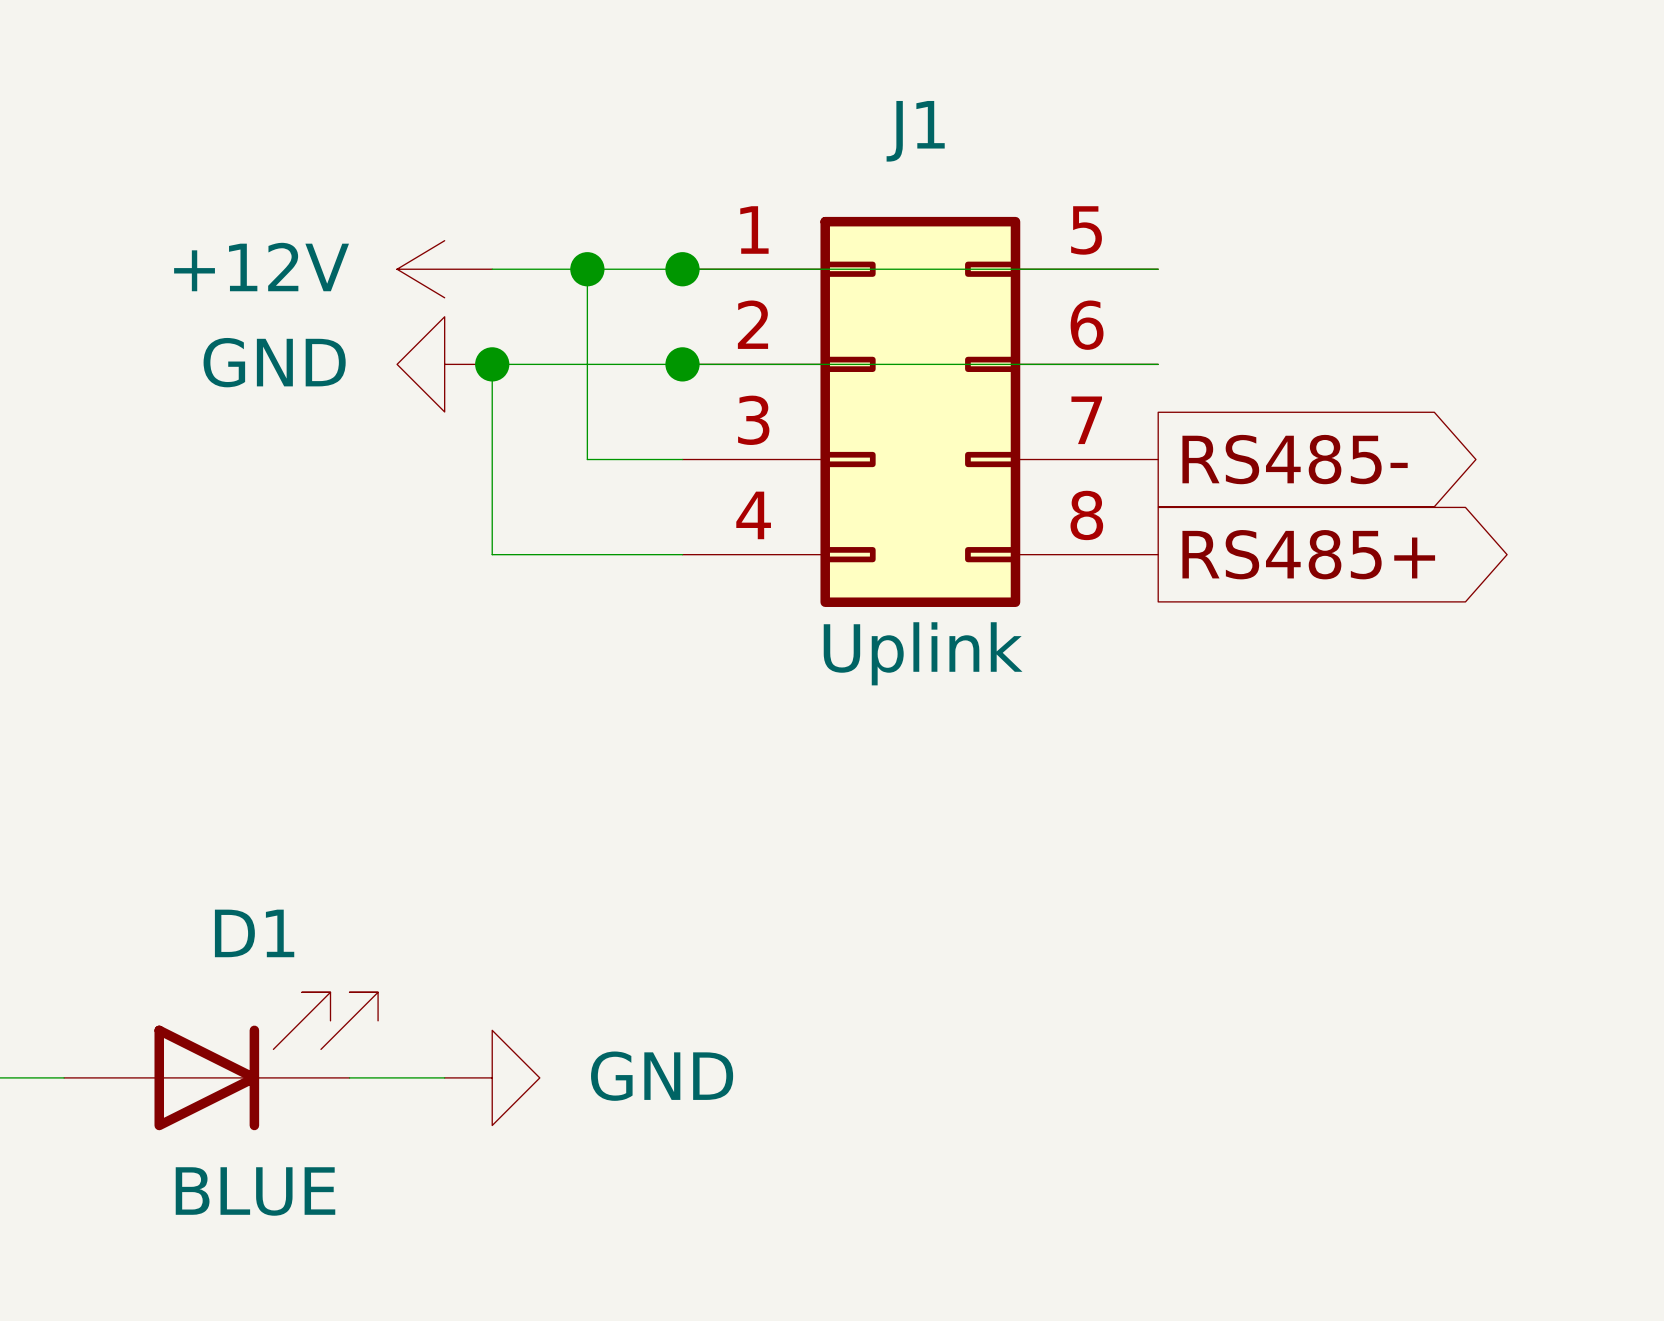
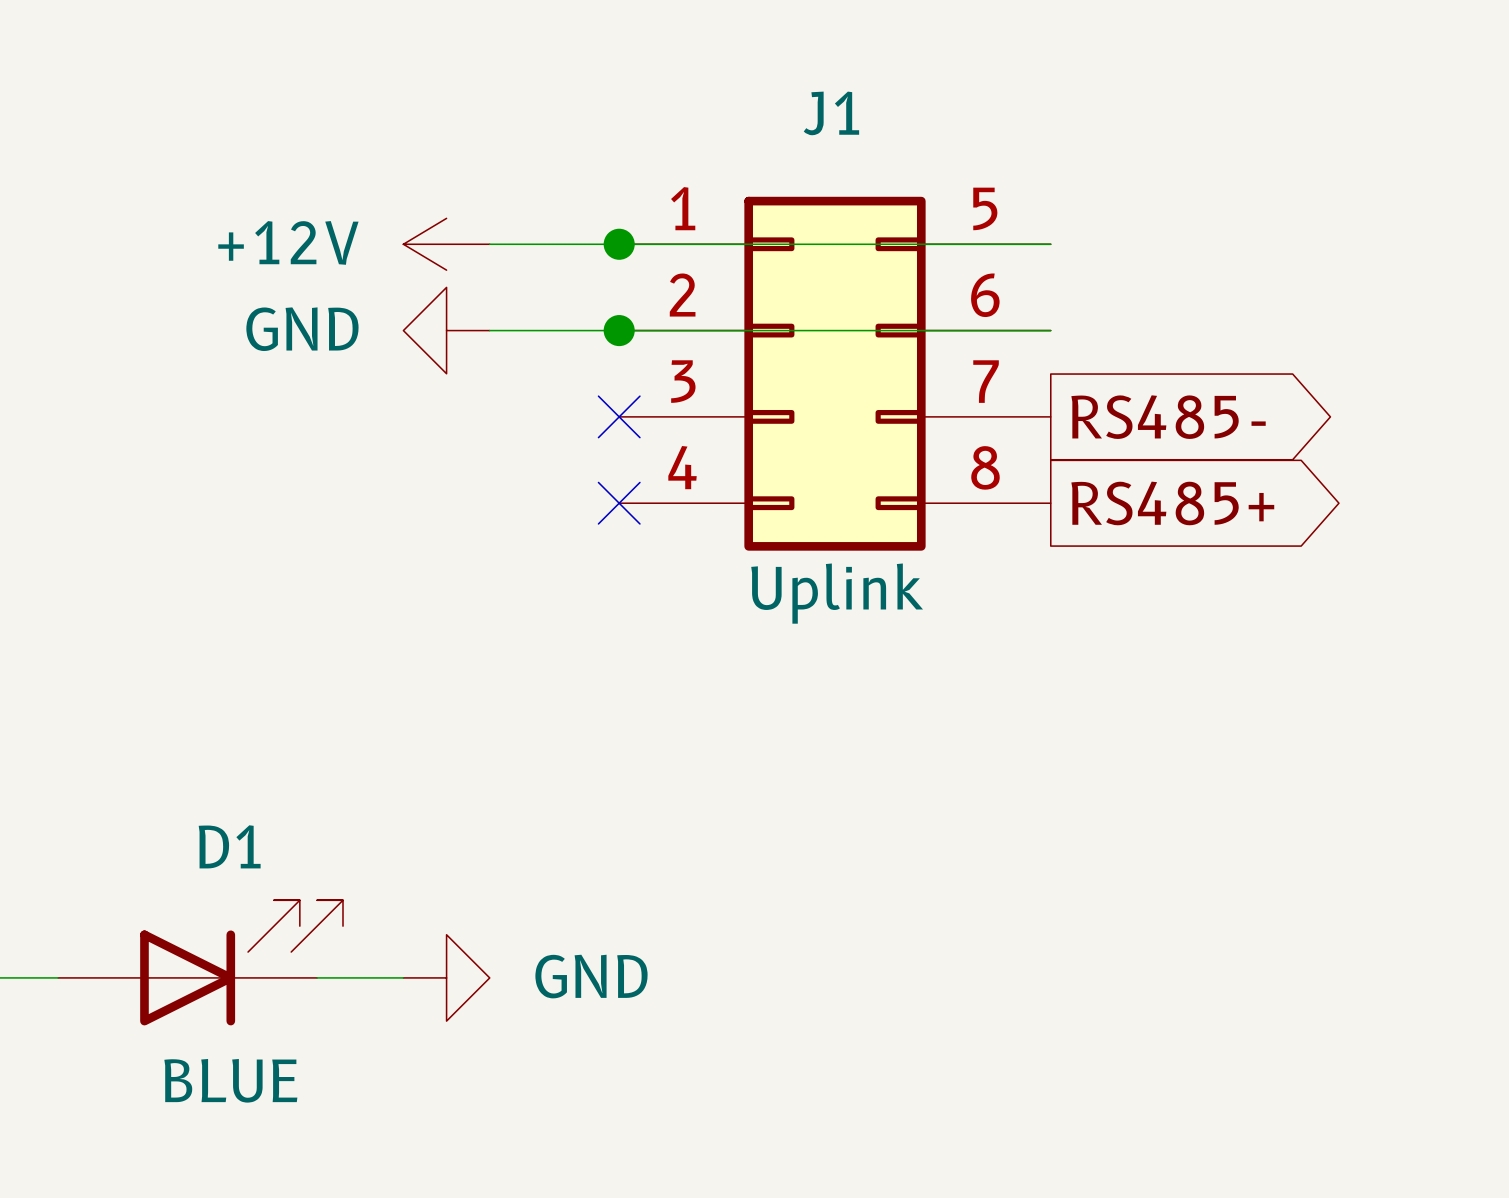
power symbol position: +12V (444, 269) -> +12V (446, 244)
wire: (587, 269) (587, 459) (682, 459) -> none
junction: (587, 269) -> none
power symbol position: GND (444, 364) -> GND (446, 330)
junction: (492, 364) -> none
wire: (539, 364) (492, 364) (492, 554) (682, 554) -> none
no-connect mark: none -> (619, 416)
no-connect mark: none -> (619, 503)

